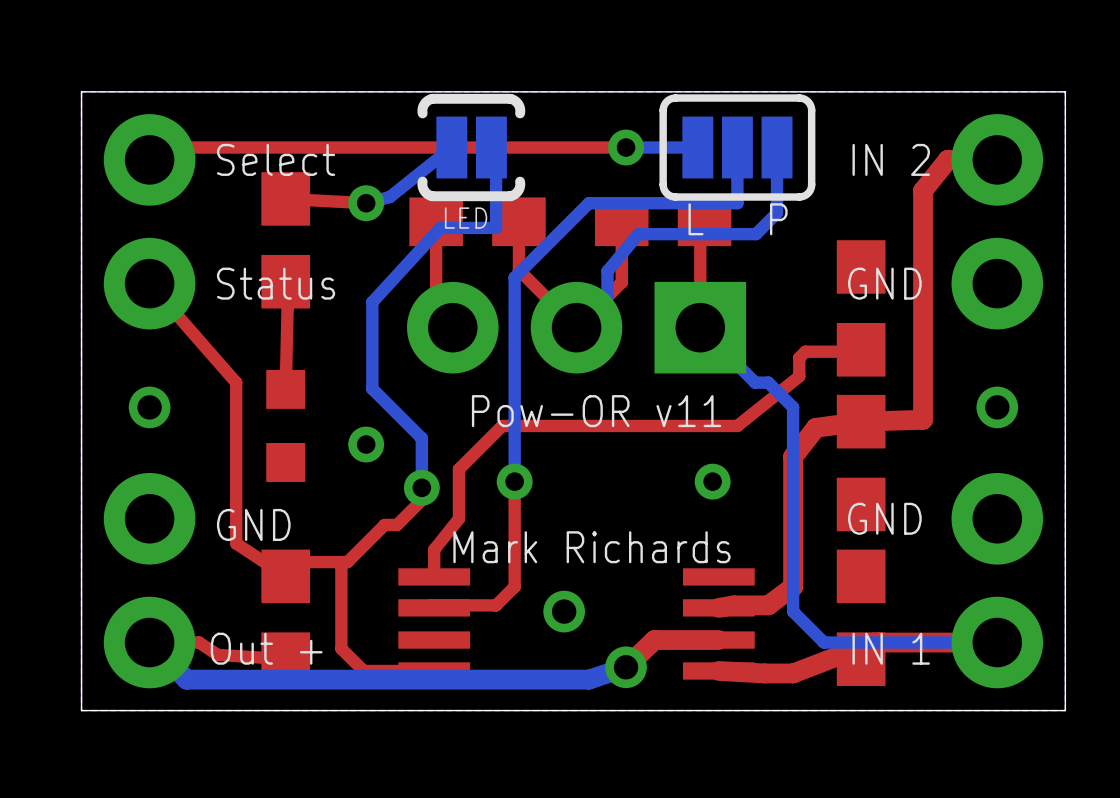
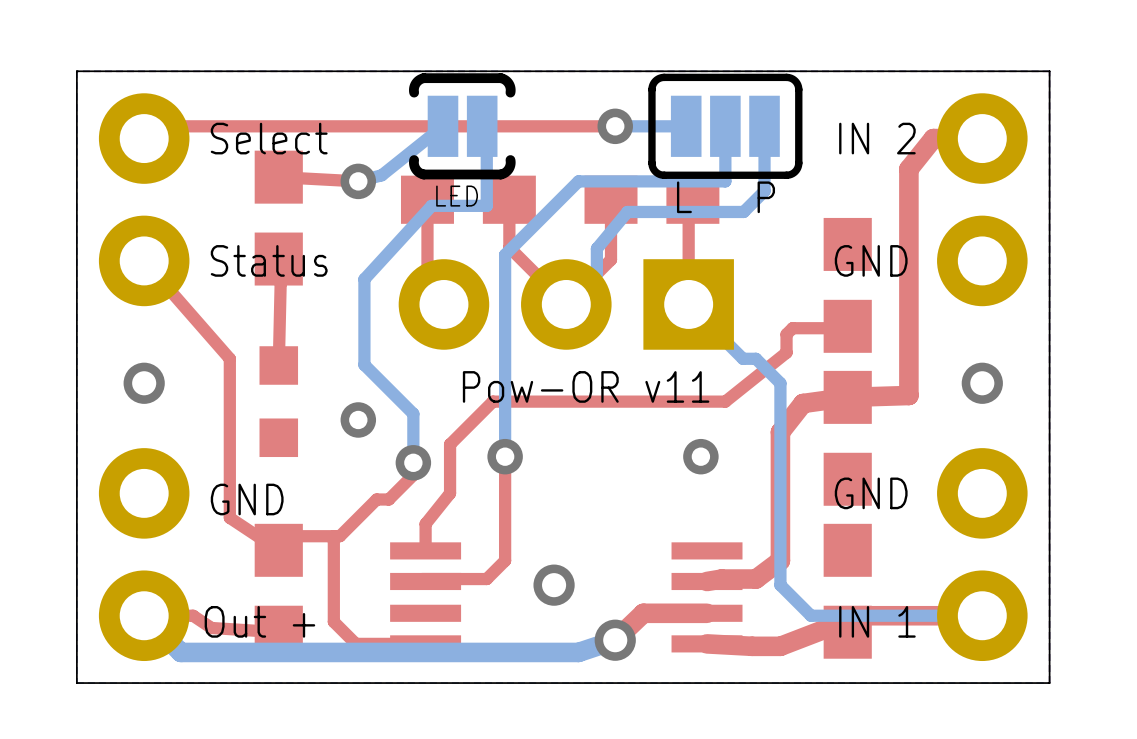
text: Mark Richards (592, 547) -> none

